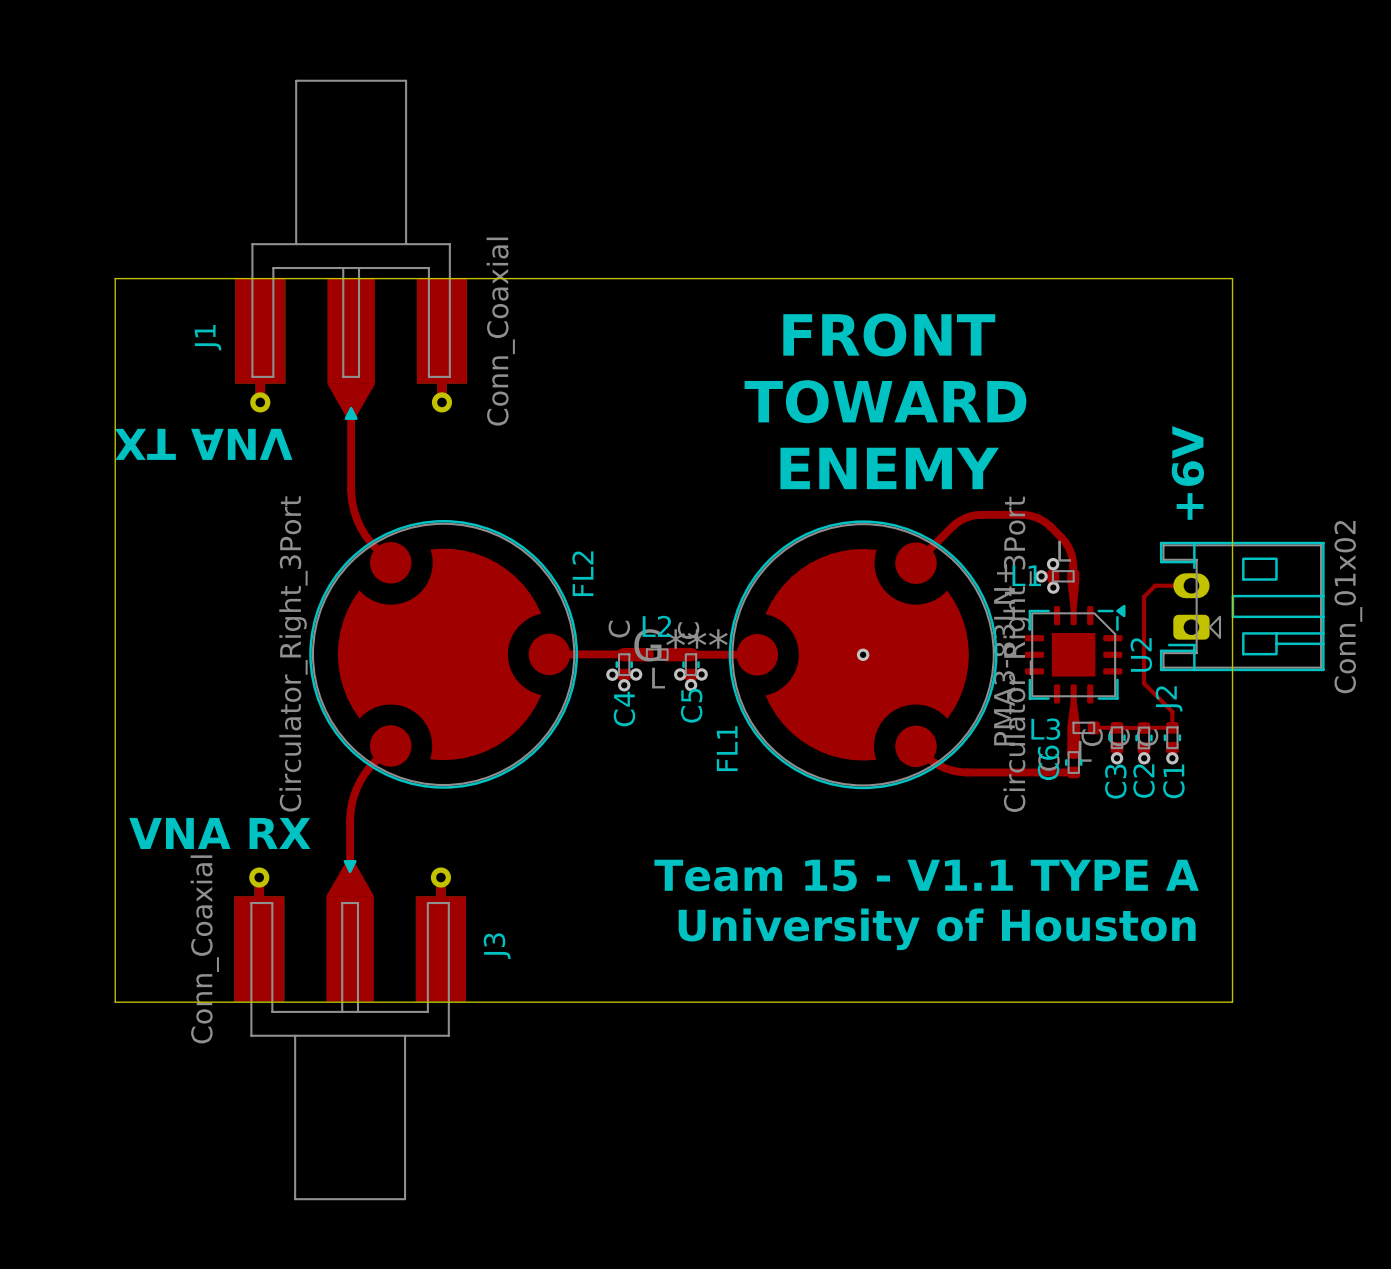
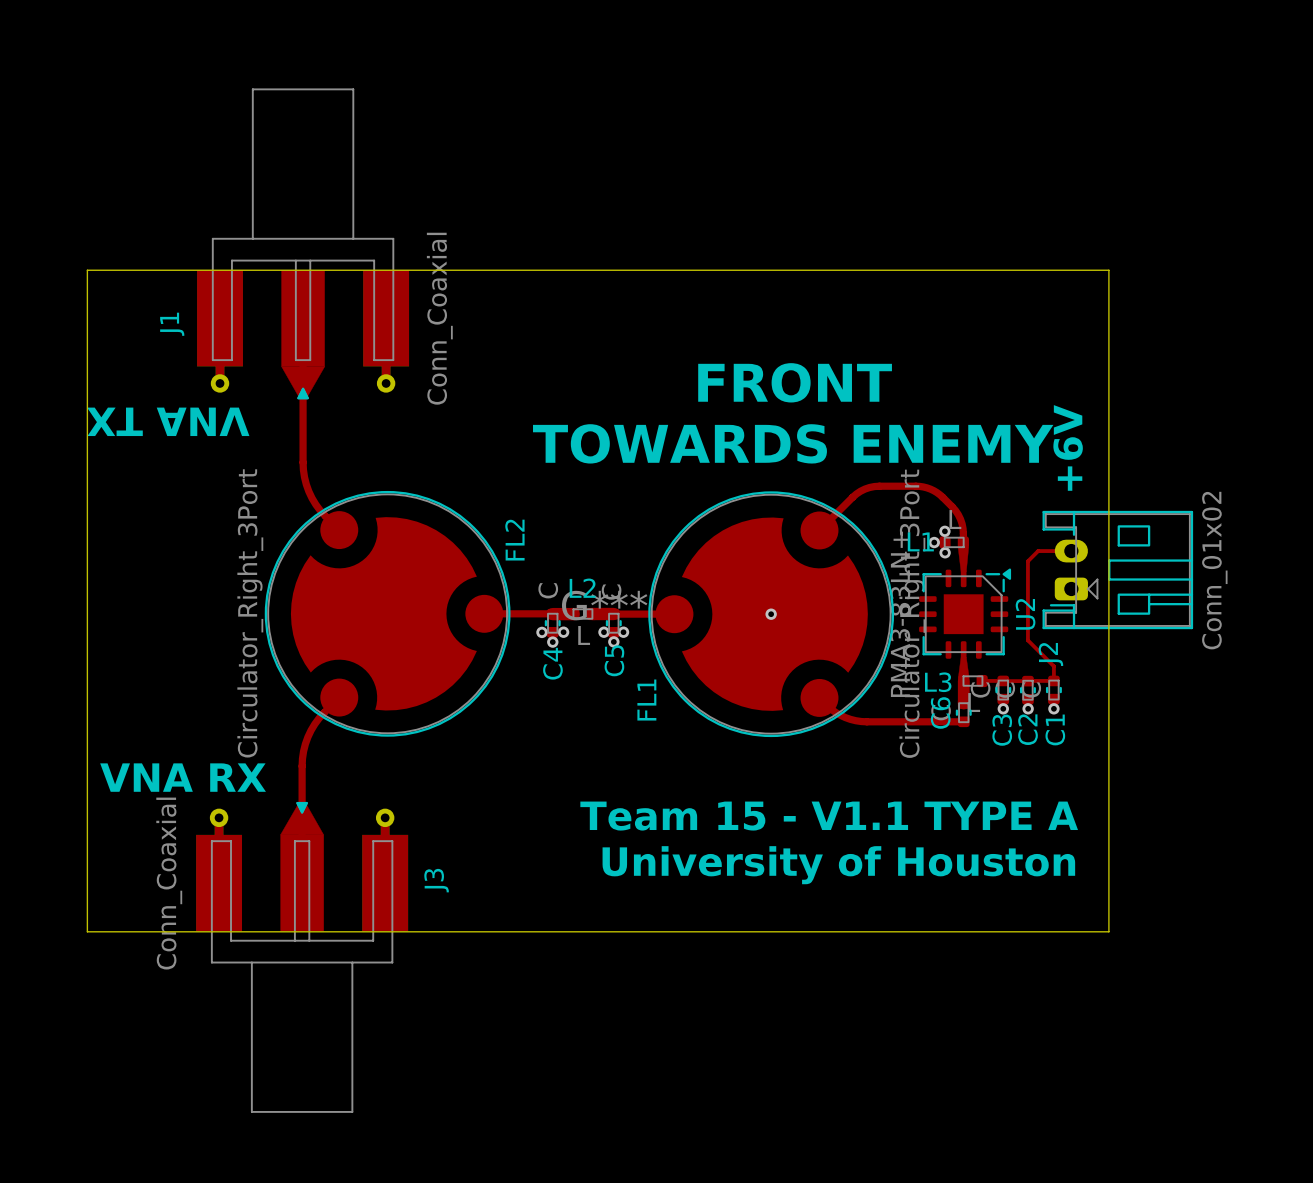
text: FRONT (889, 334) -> none
text: TOWARD (885, 401) -> FRONT (795, 382)
text: ENEMY (889, 468) -> TOWARDS ENEMY (793, 443)

